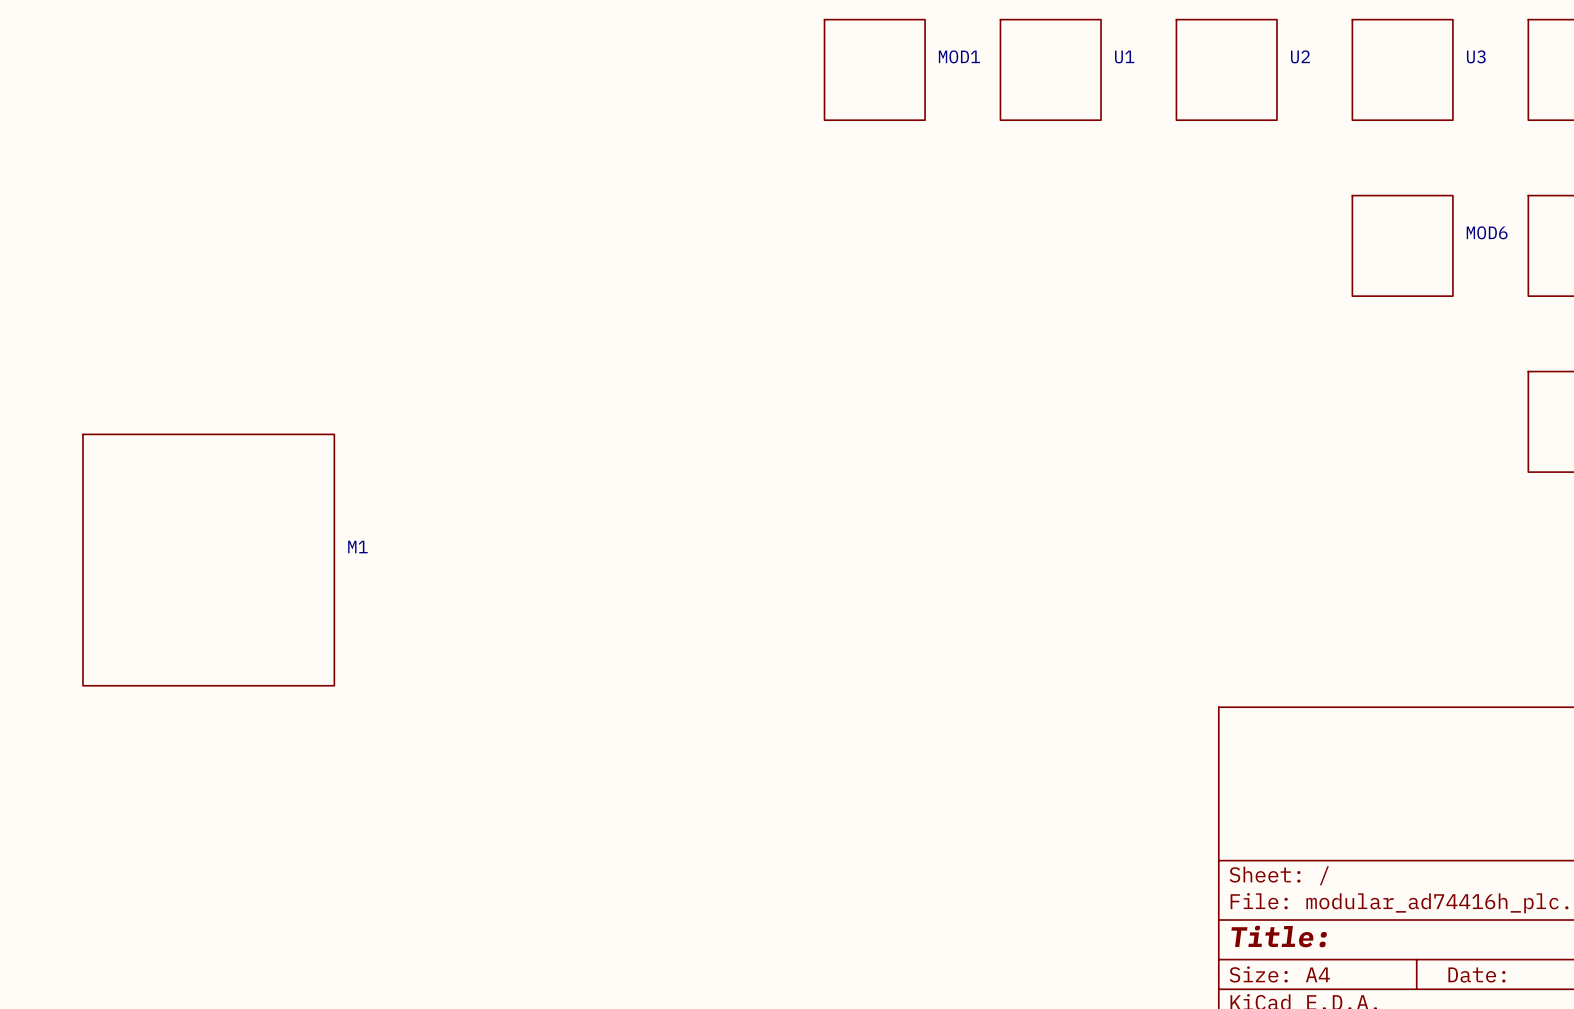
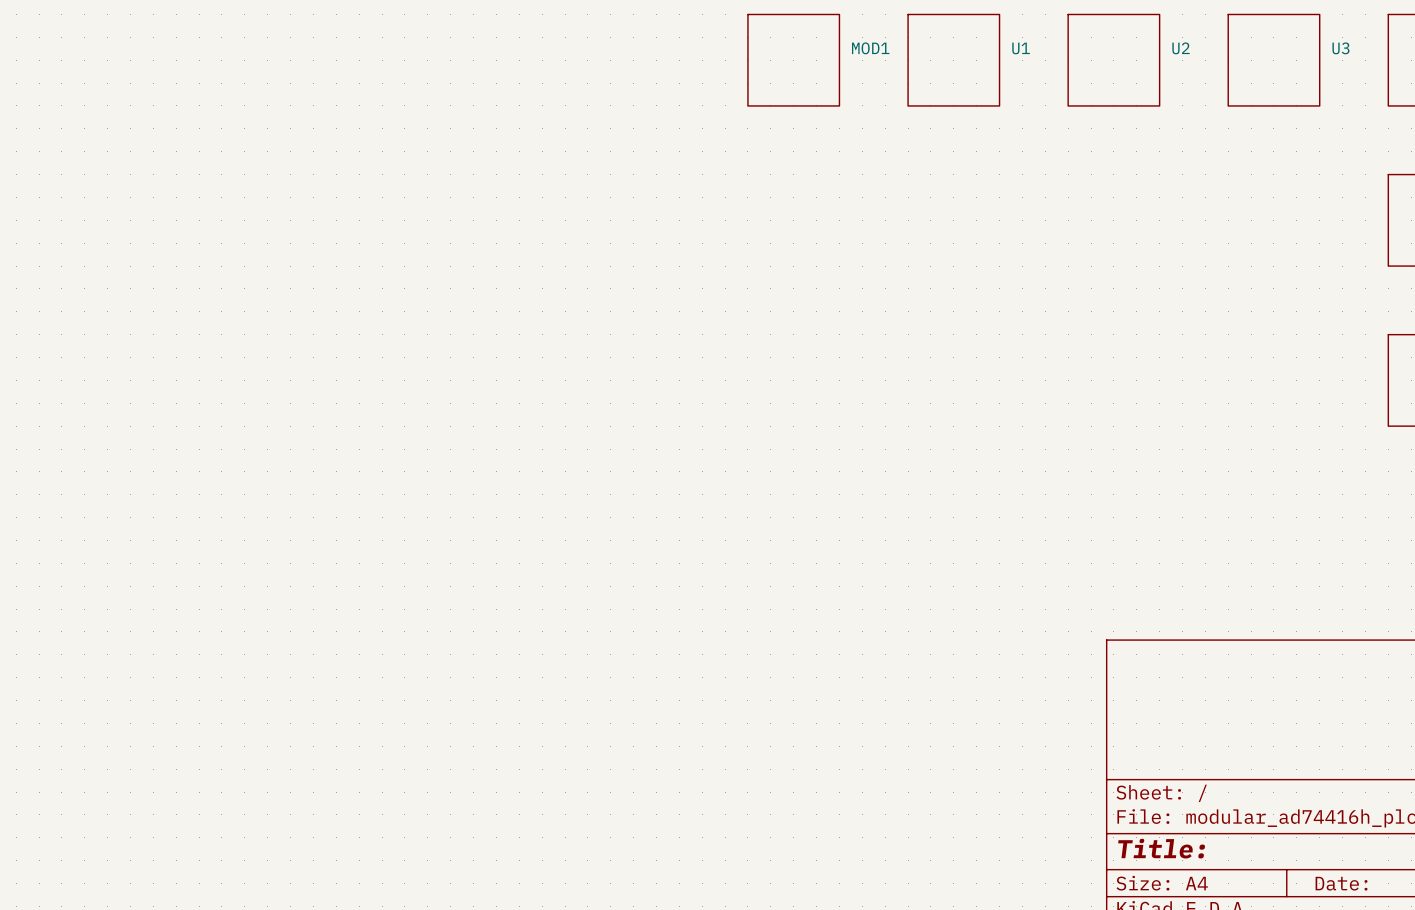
MOD6: (1402, 245) -> none
M1: (208, 560) -> none

